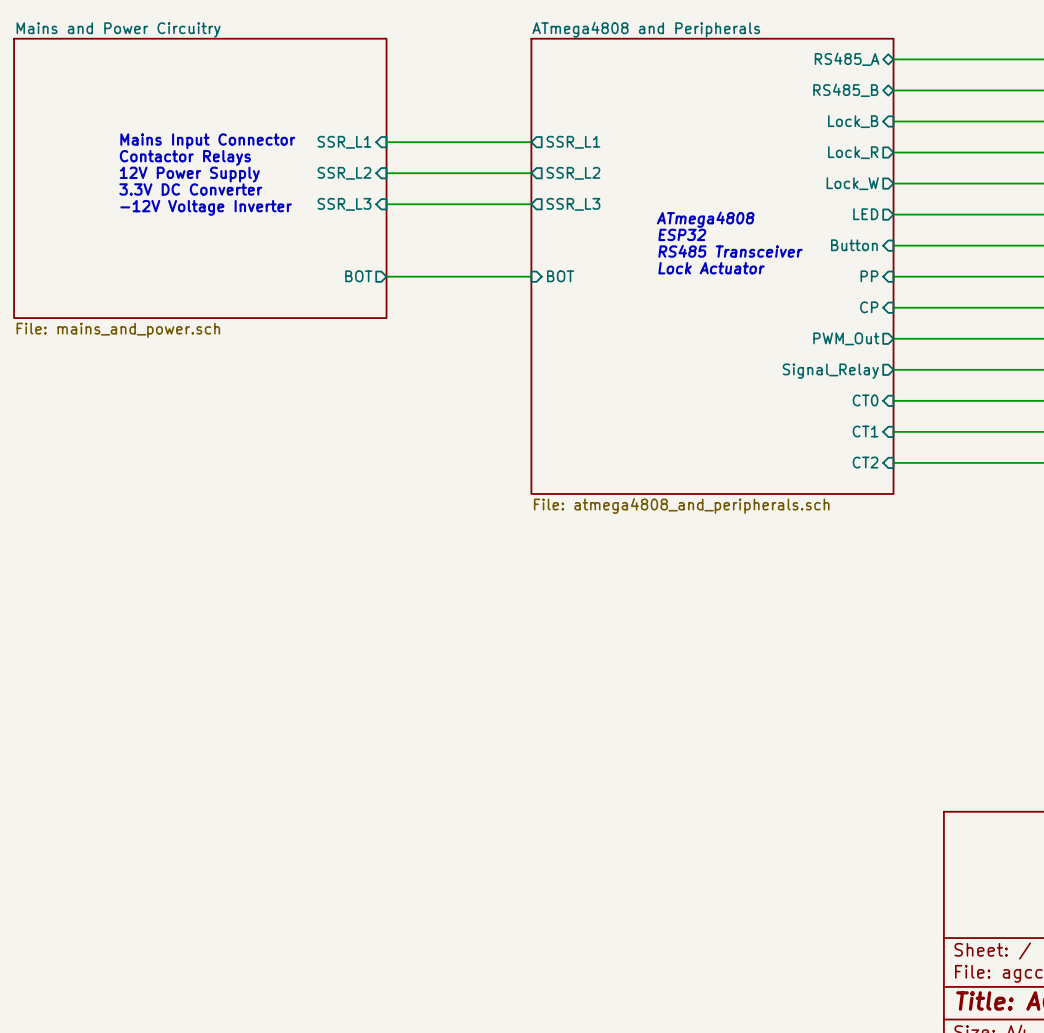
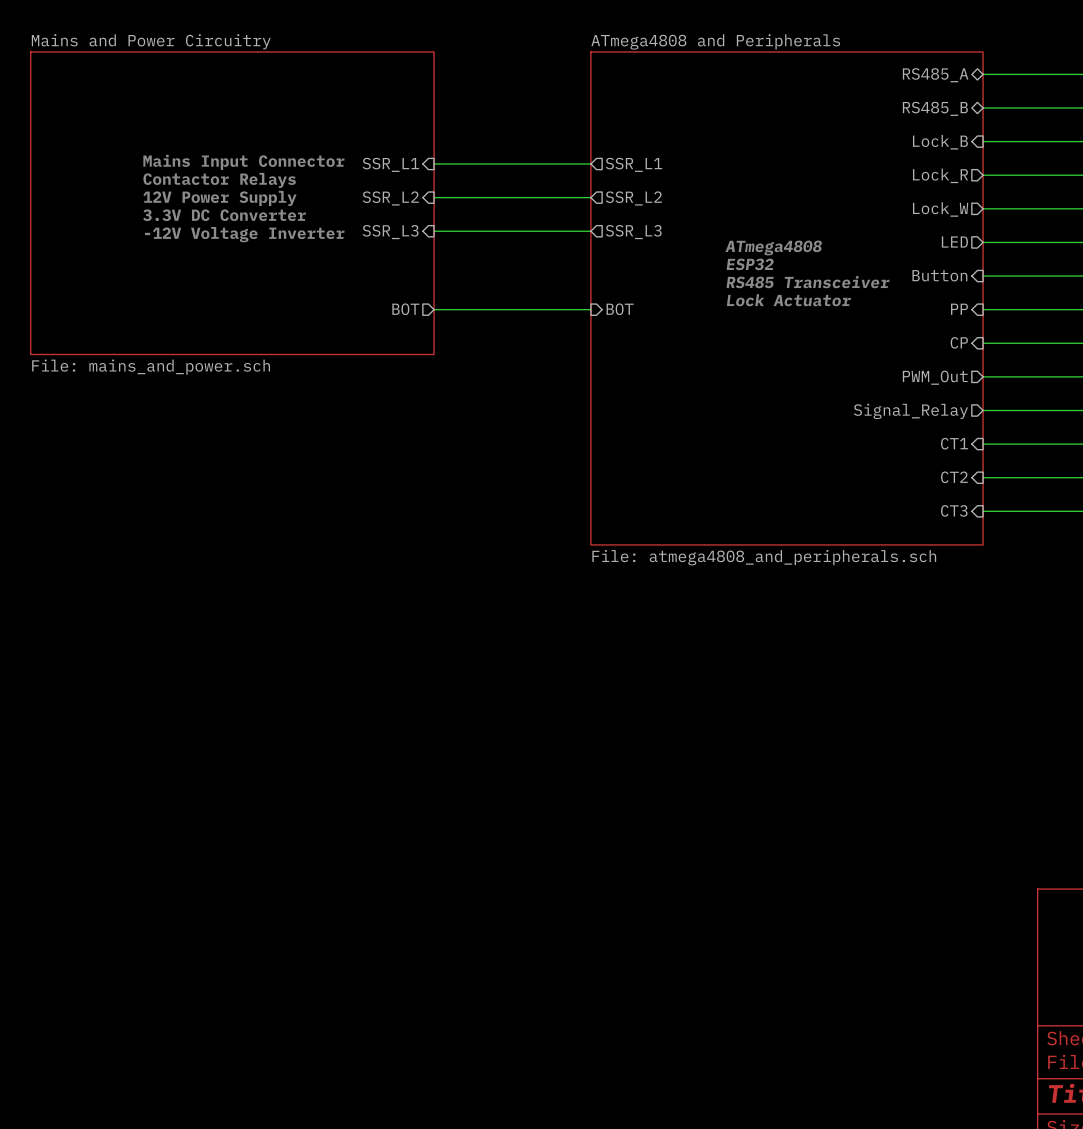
sheet pin: CT0 (865, 400) -> CT1 (954, 443)
sheet pin: CT1 (865, 431) -> CT2 (954, 477)
sheet pin: CT2 (865, 462) -> CT3 (954, 510)

